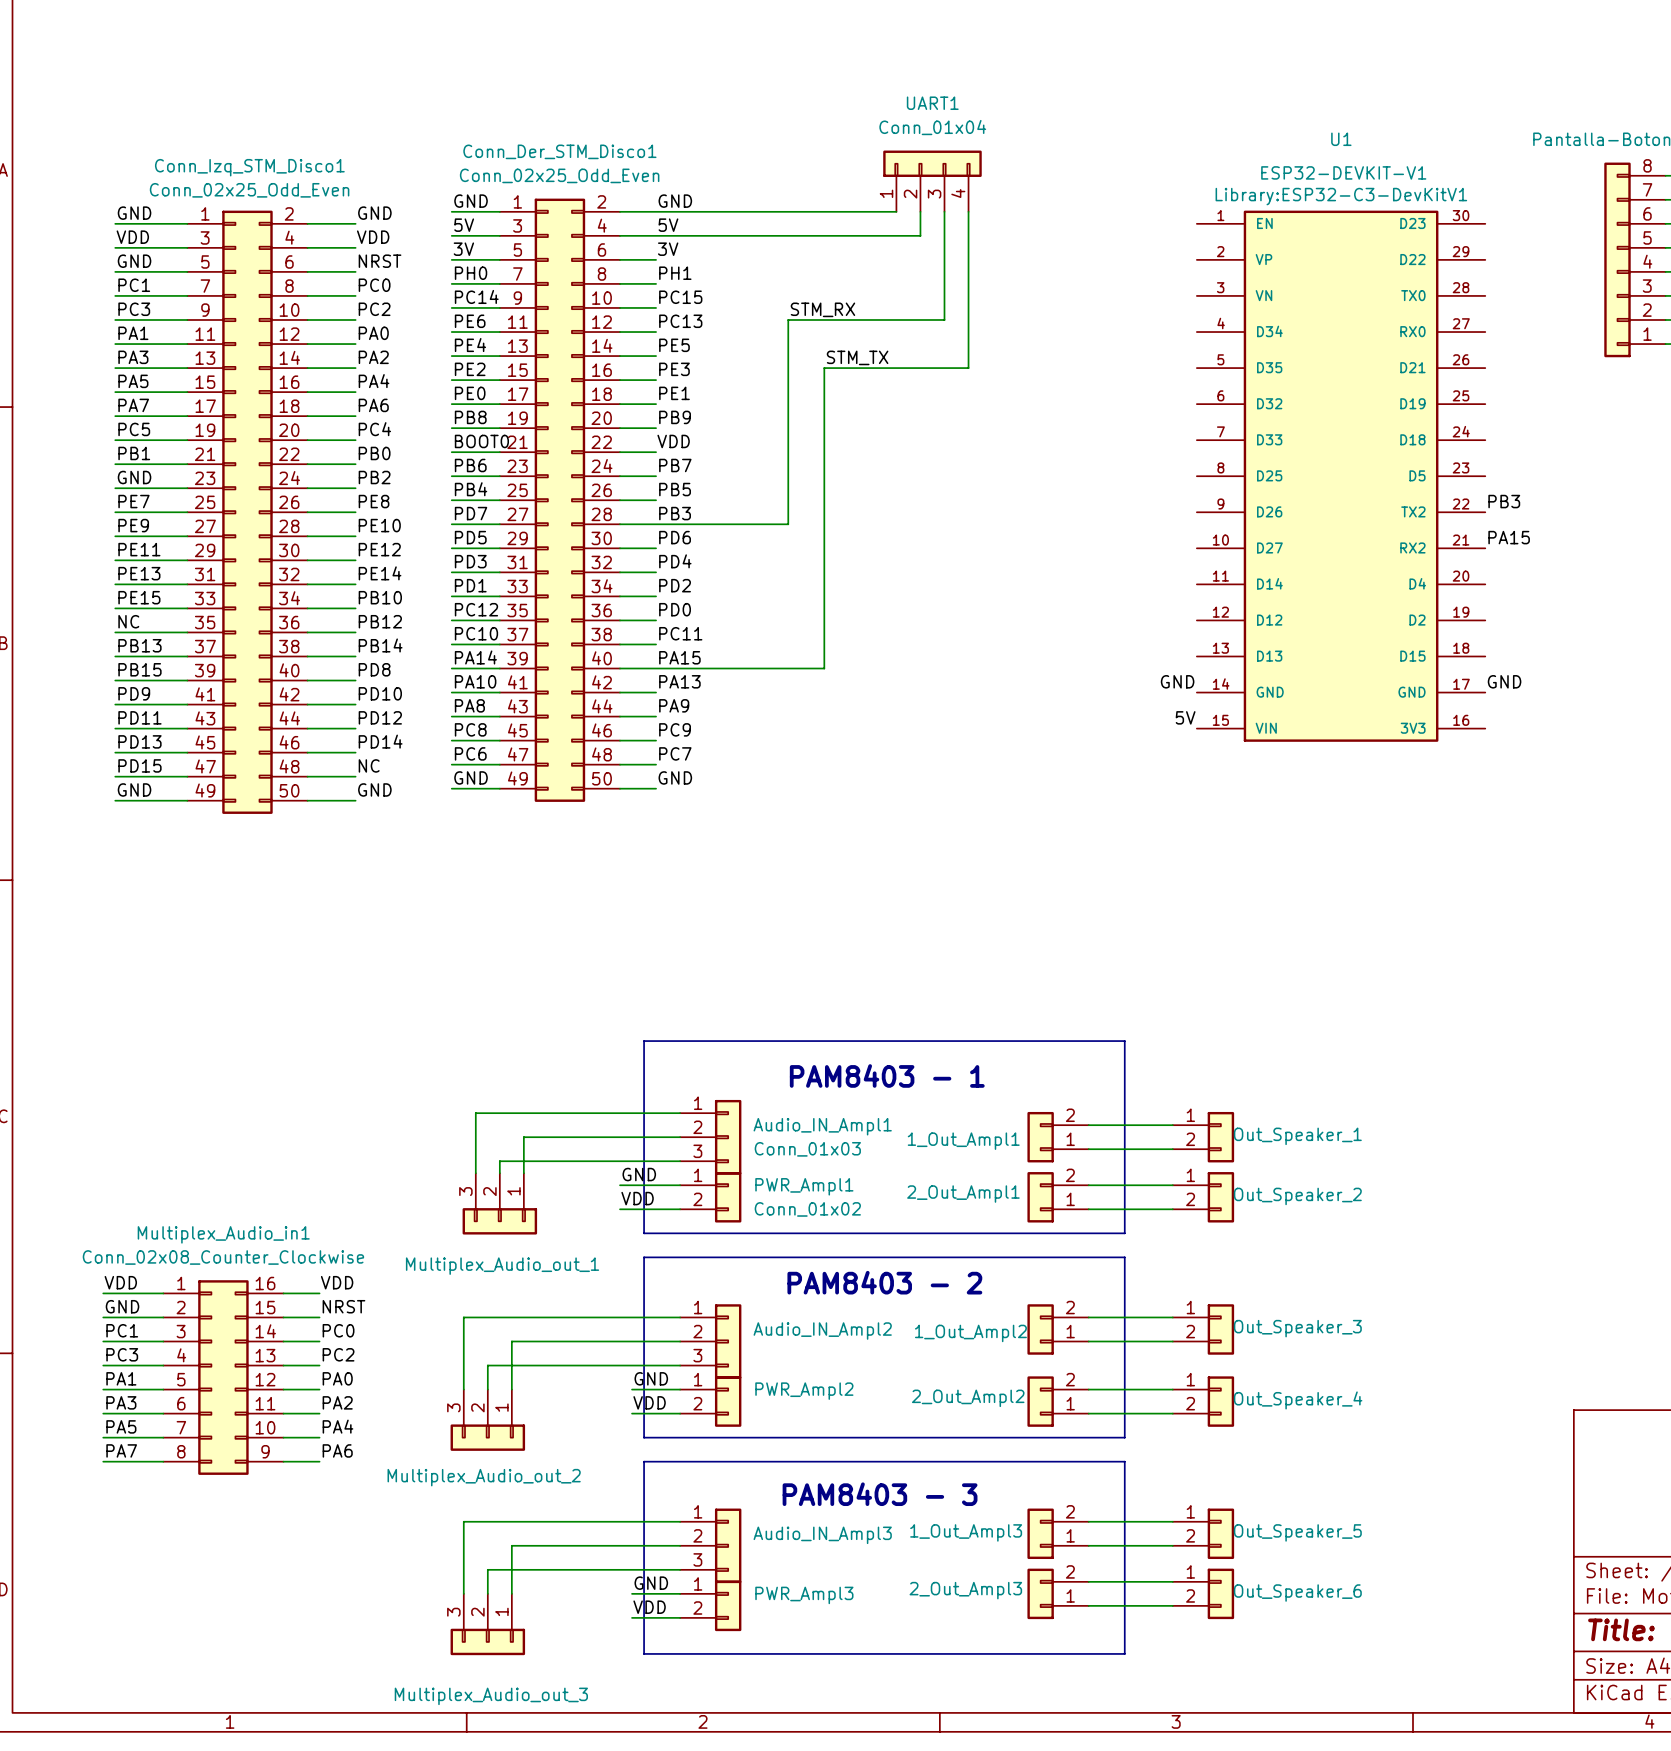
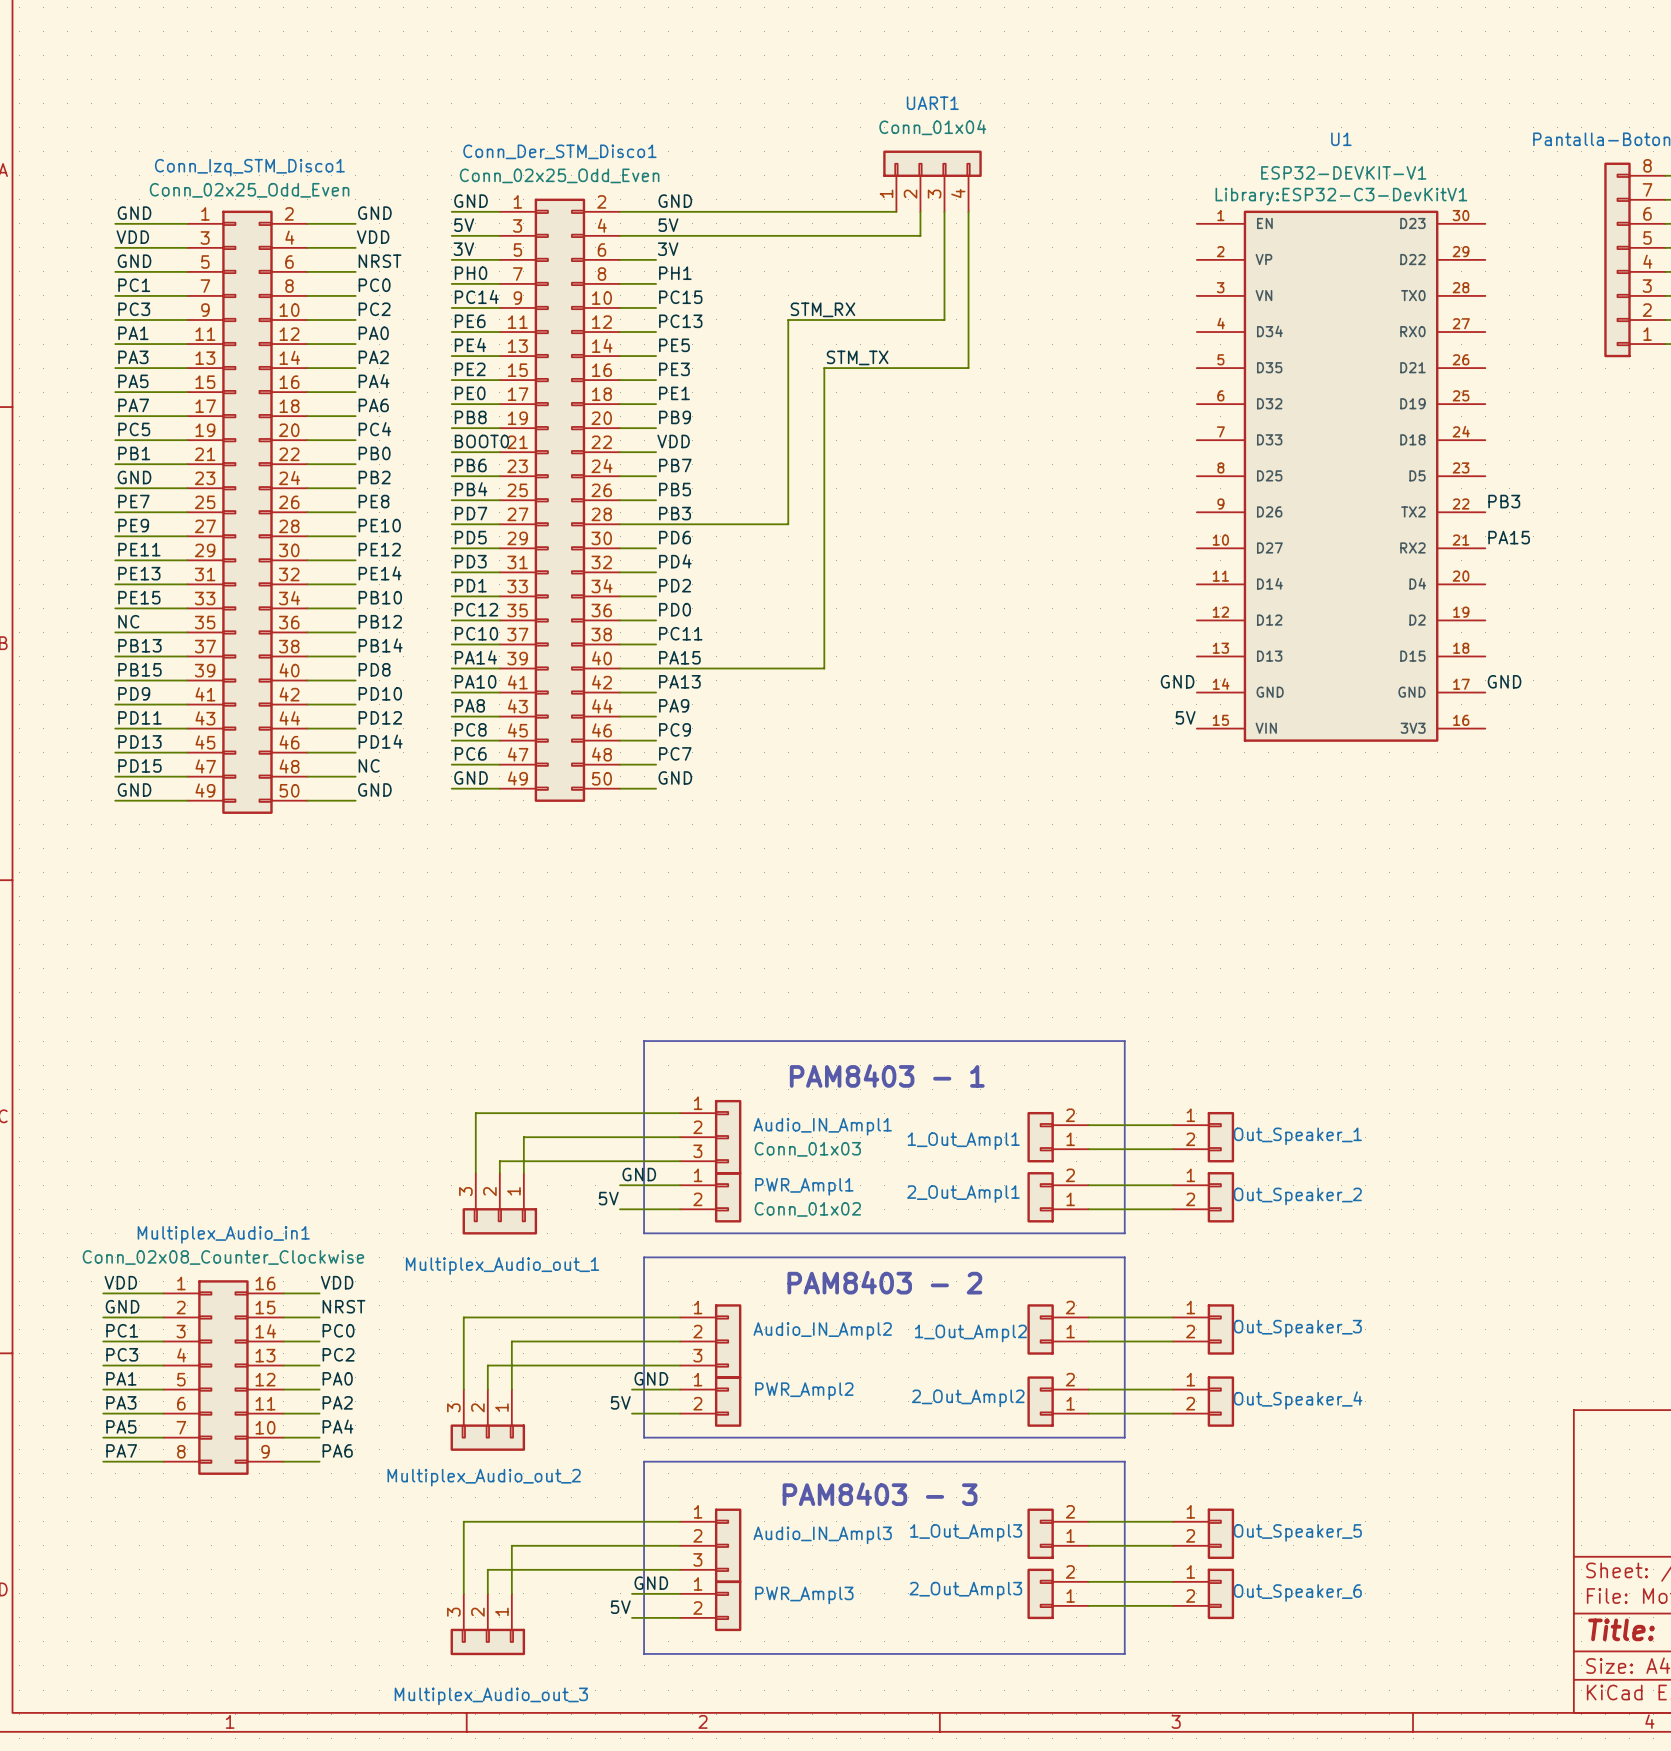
label: VDD (637, 1198) -> 5V (608, 1198)
label: VDD (649, 1402) -> 5V (620, 1402)
label: VDD (649, 1607) -> 5V (620, 1607)

